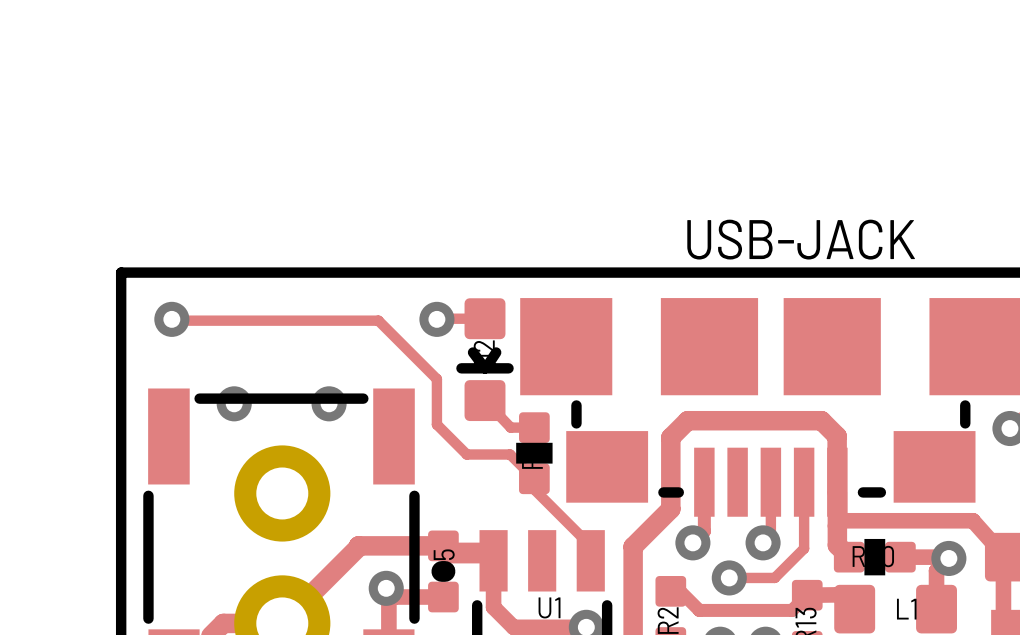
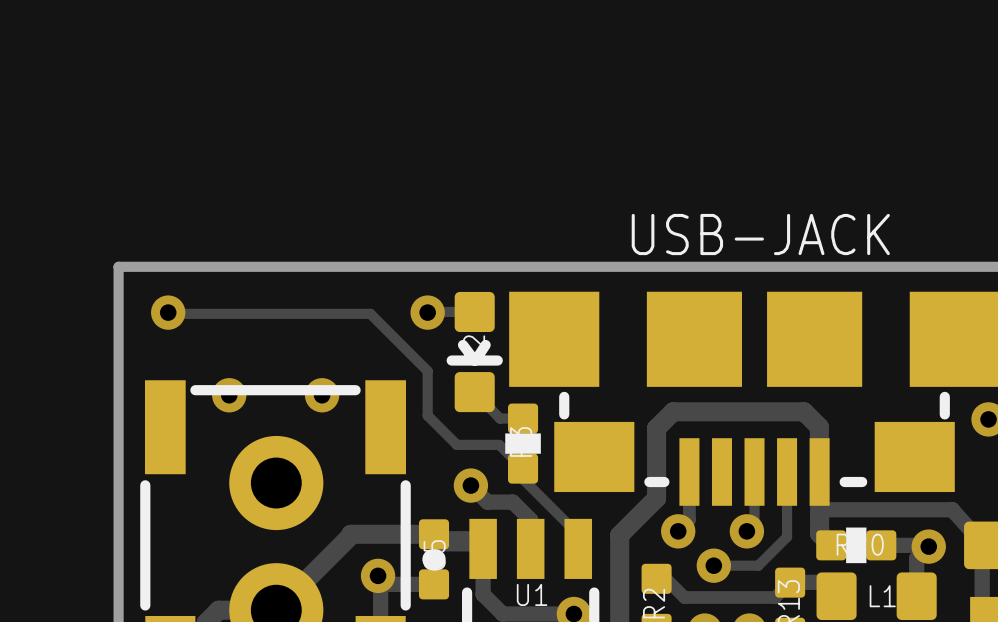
track: none -> (470, 485) (487, 502) (512, 502) (530, 519) (530, 548)
via: none -> (470, 485)

